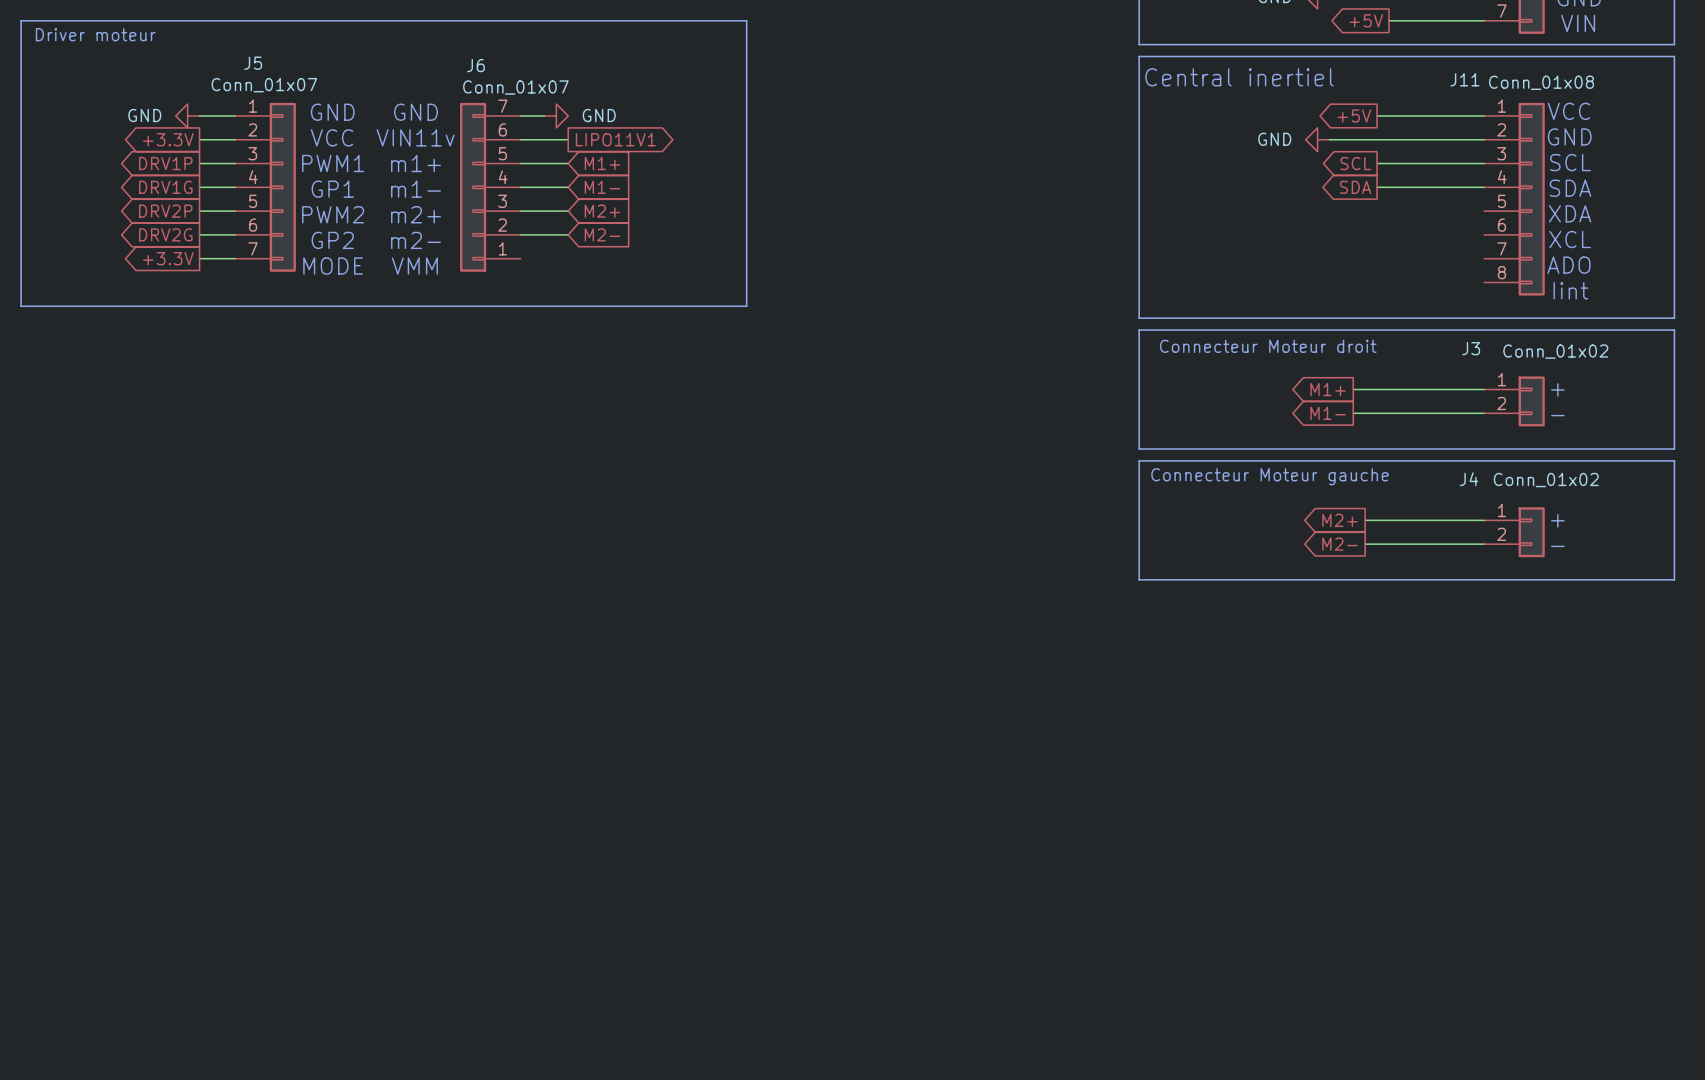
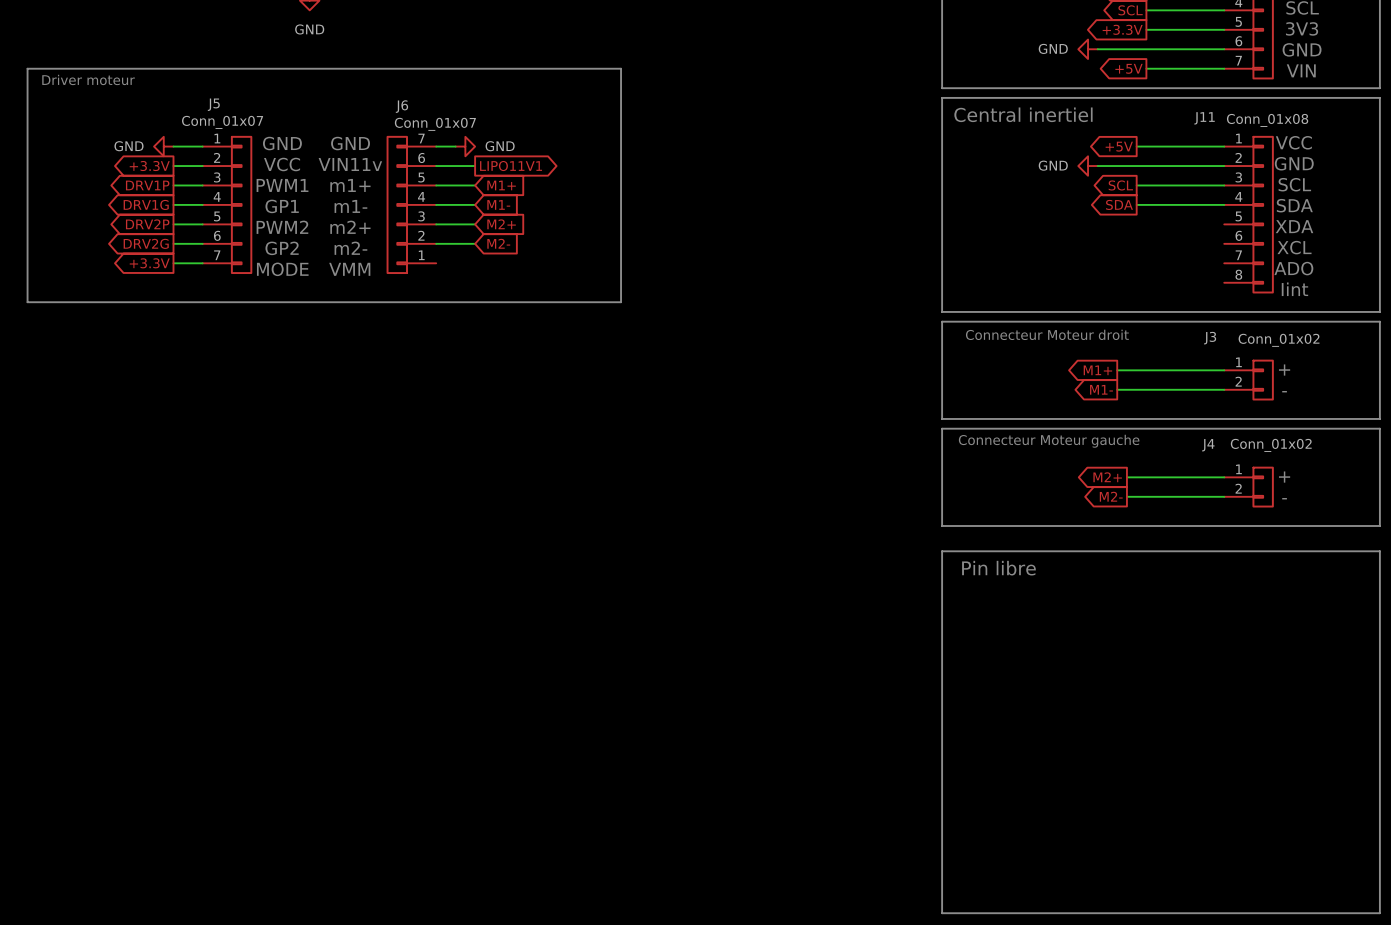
line: none -> (942, 551) (1379, 551) (1379, 913) (942, 913) (942, 551)
text: none -> Pin libre (998, 568)

